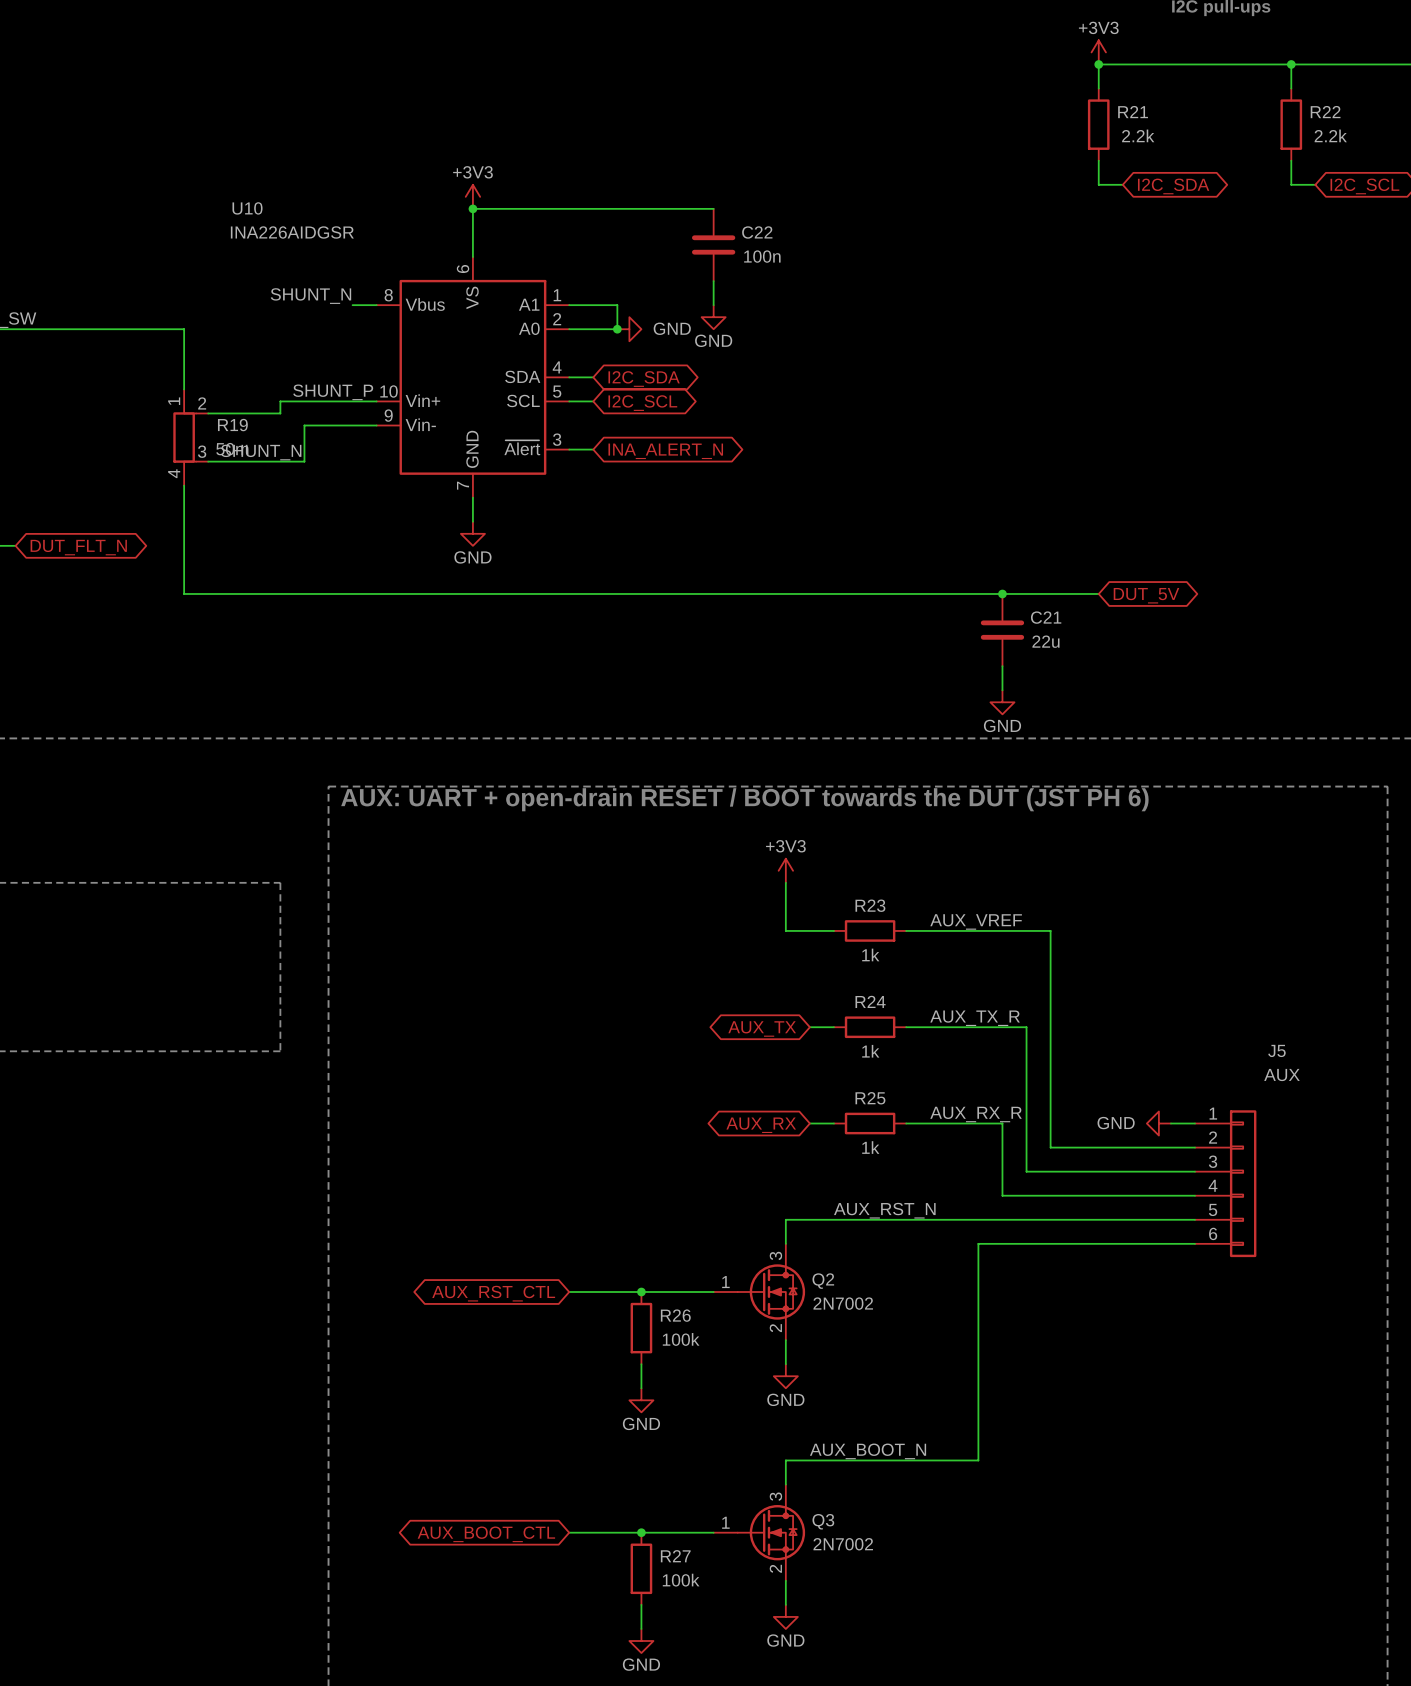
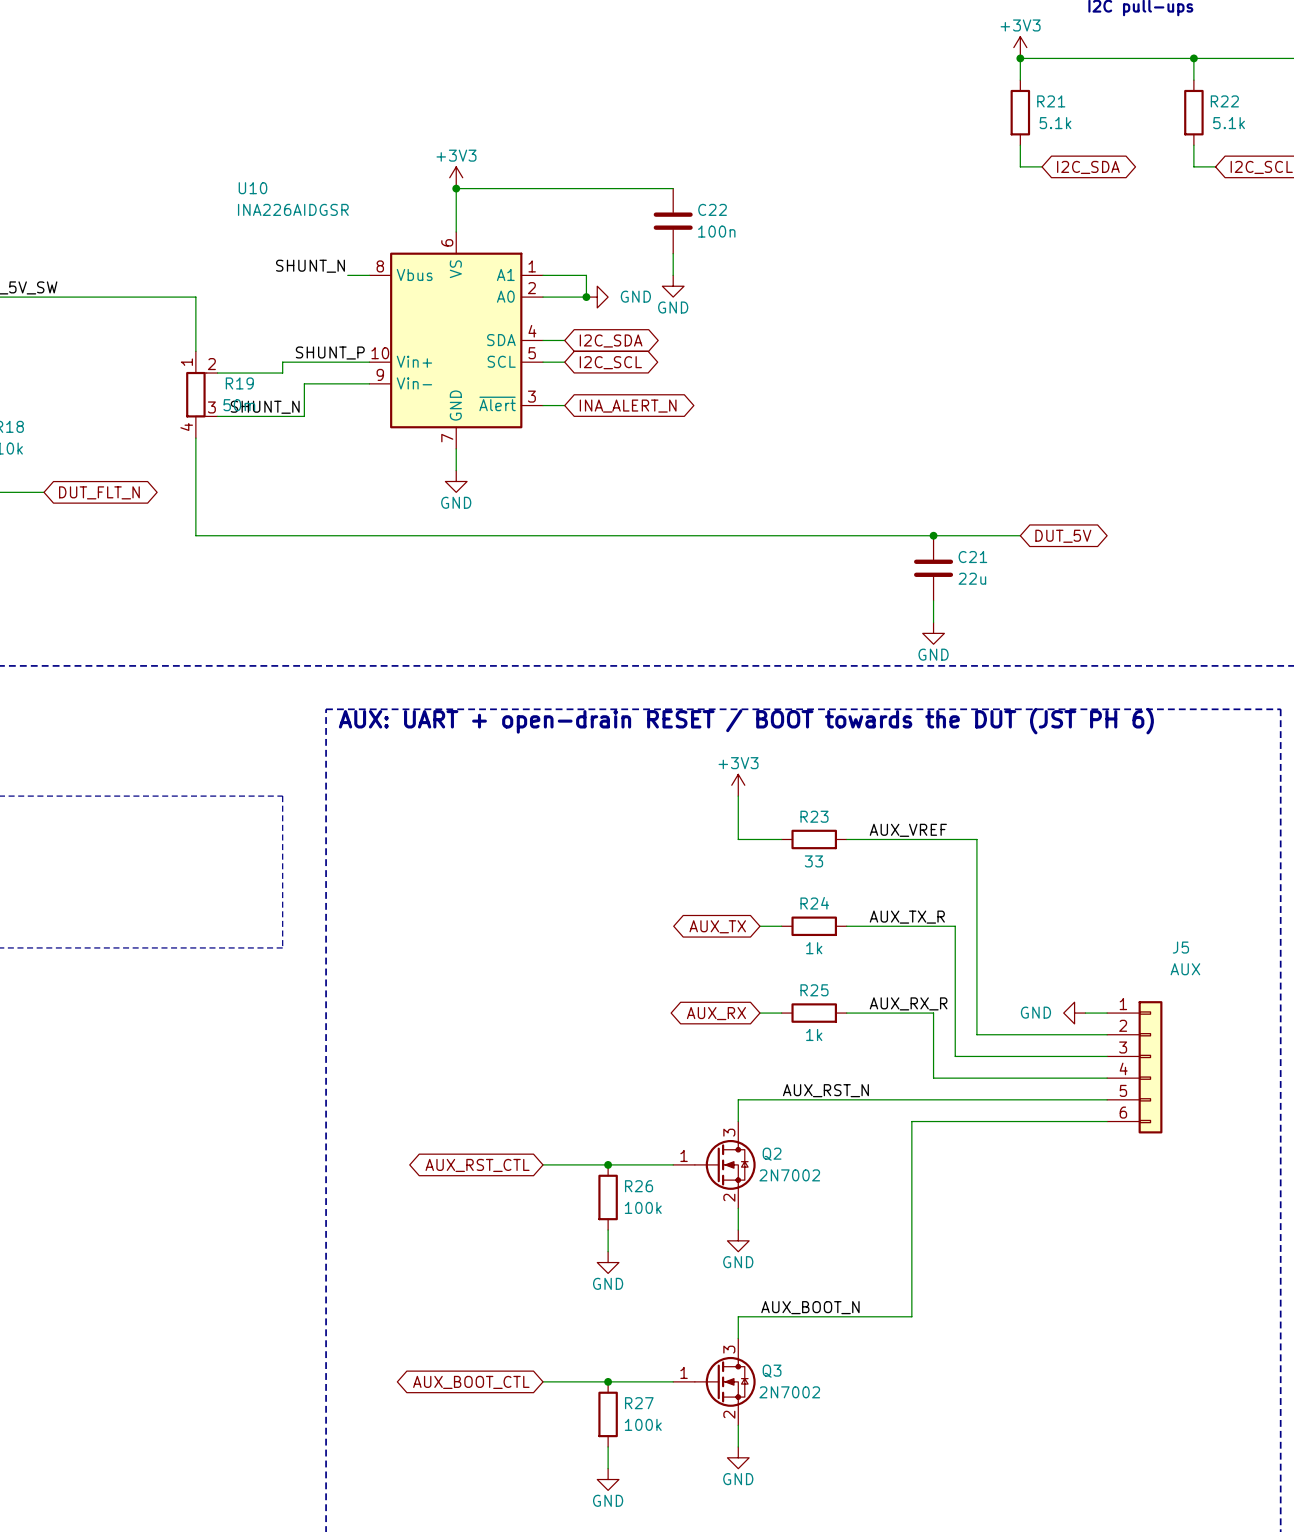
R21 value: 2.2k (1138, 135) -> 5.1k (1055, 123)
R22 value: 2.2k (1330, 135) -> 5.1k (1229, 123)
R23 value: 1k (870, 954) -> 33 (813, 861)

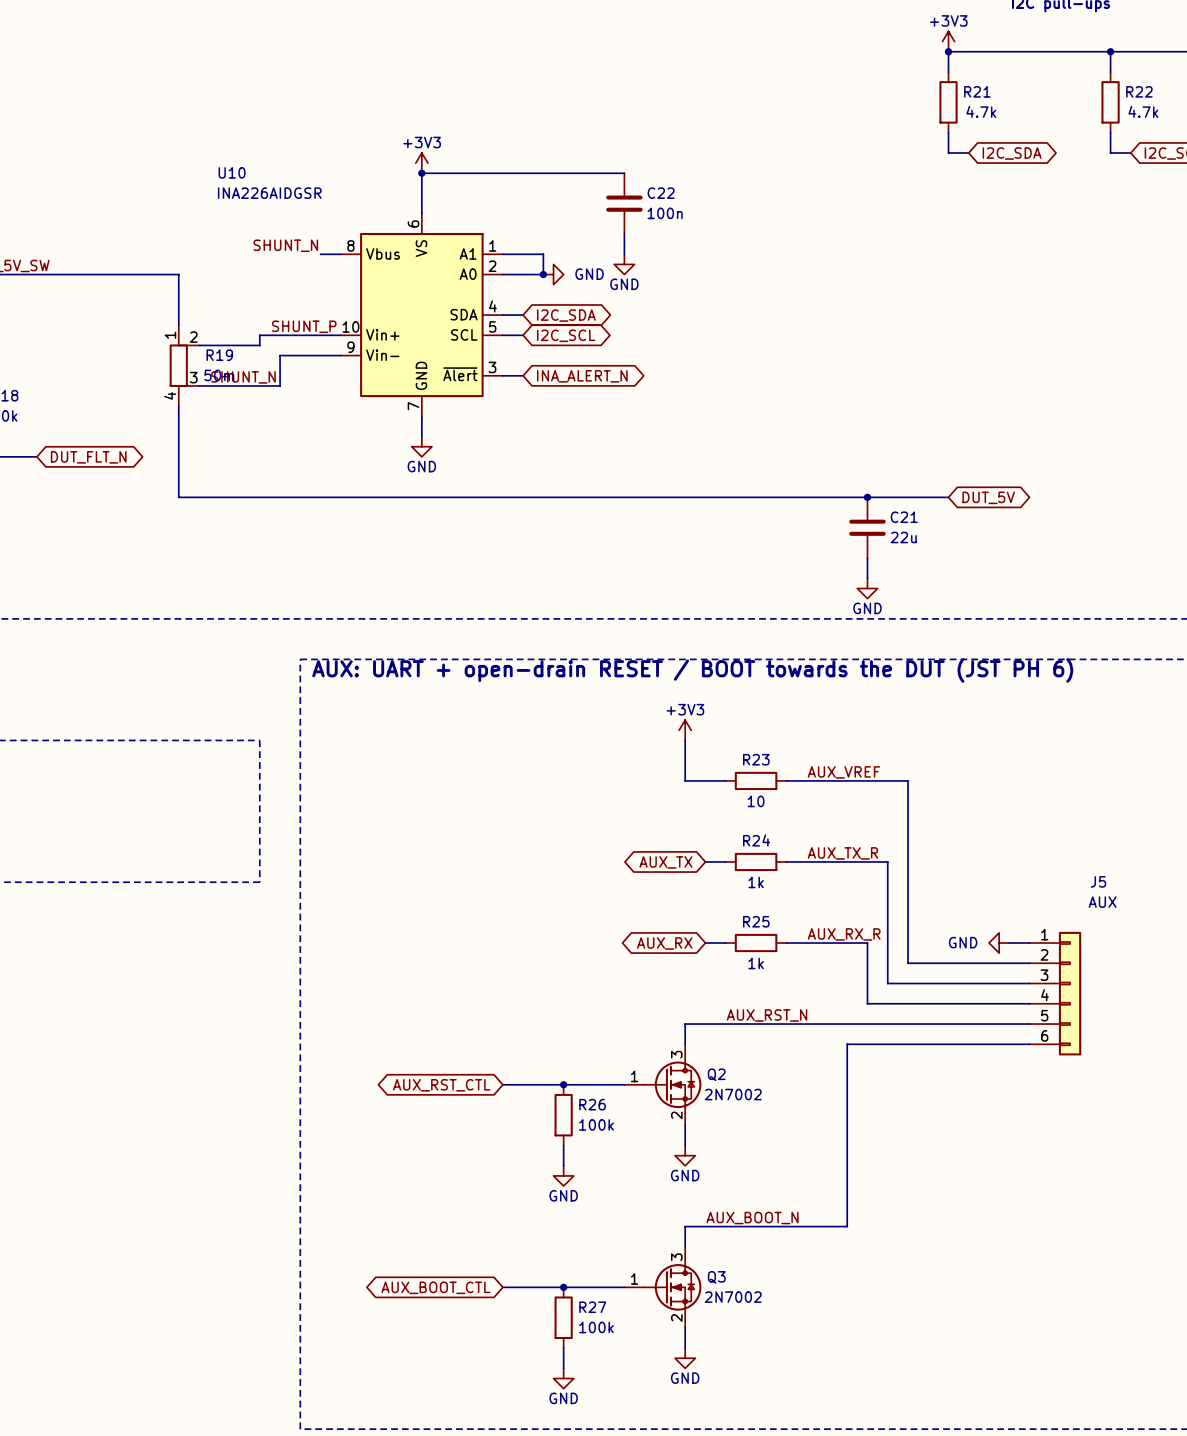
R21 value: 5.1k (1055, 123) -> 4.7k (981, 111)
R22 value: 5.1k (1229, 123) -> 4.7k (1143, 111)
R23 value: 33 (813, 861) -> 10 (756, 801)

